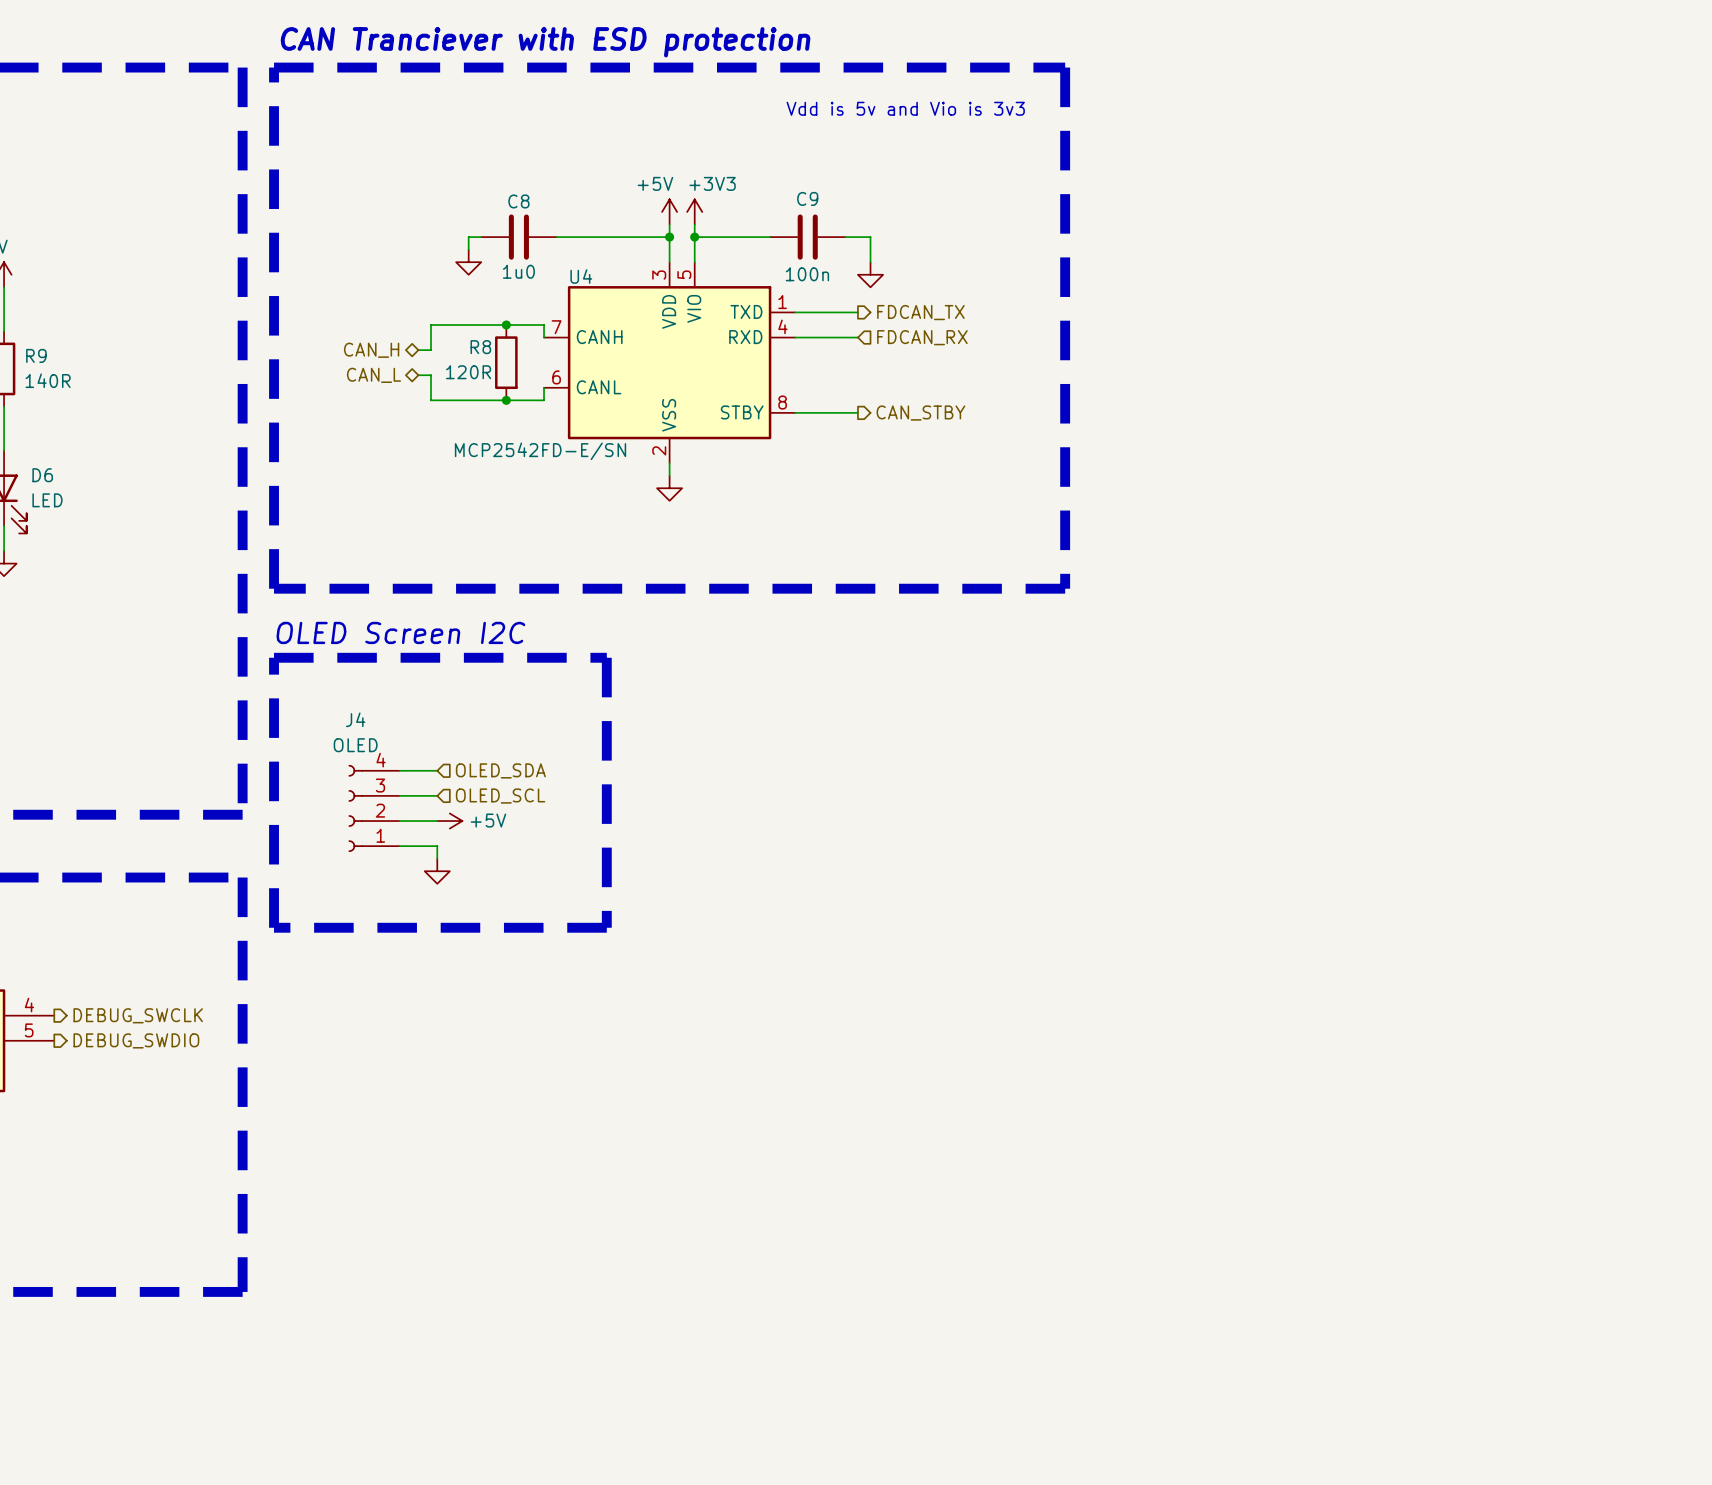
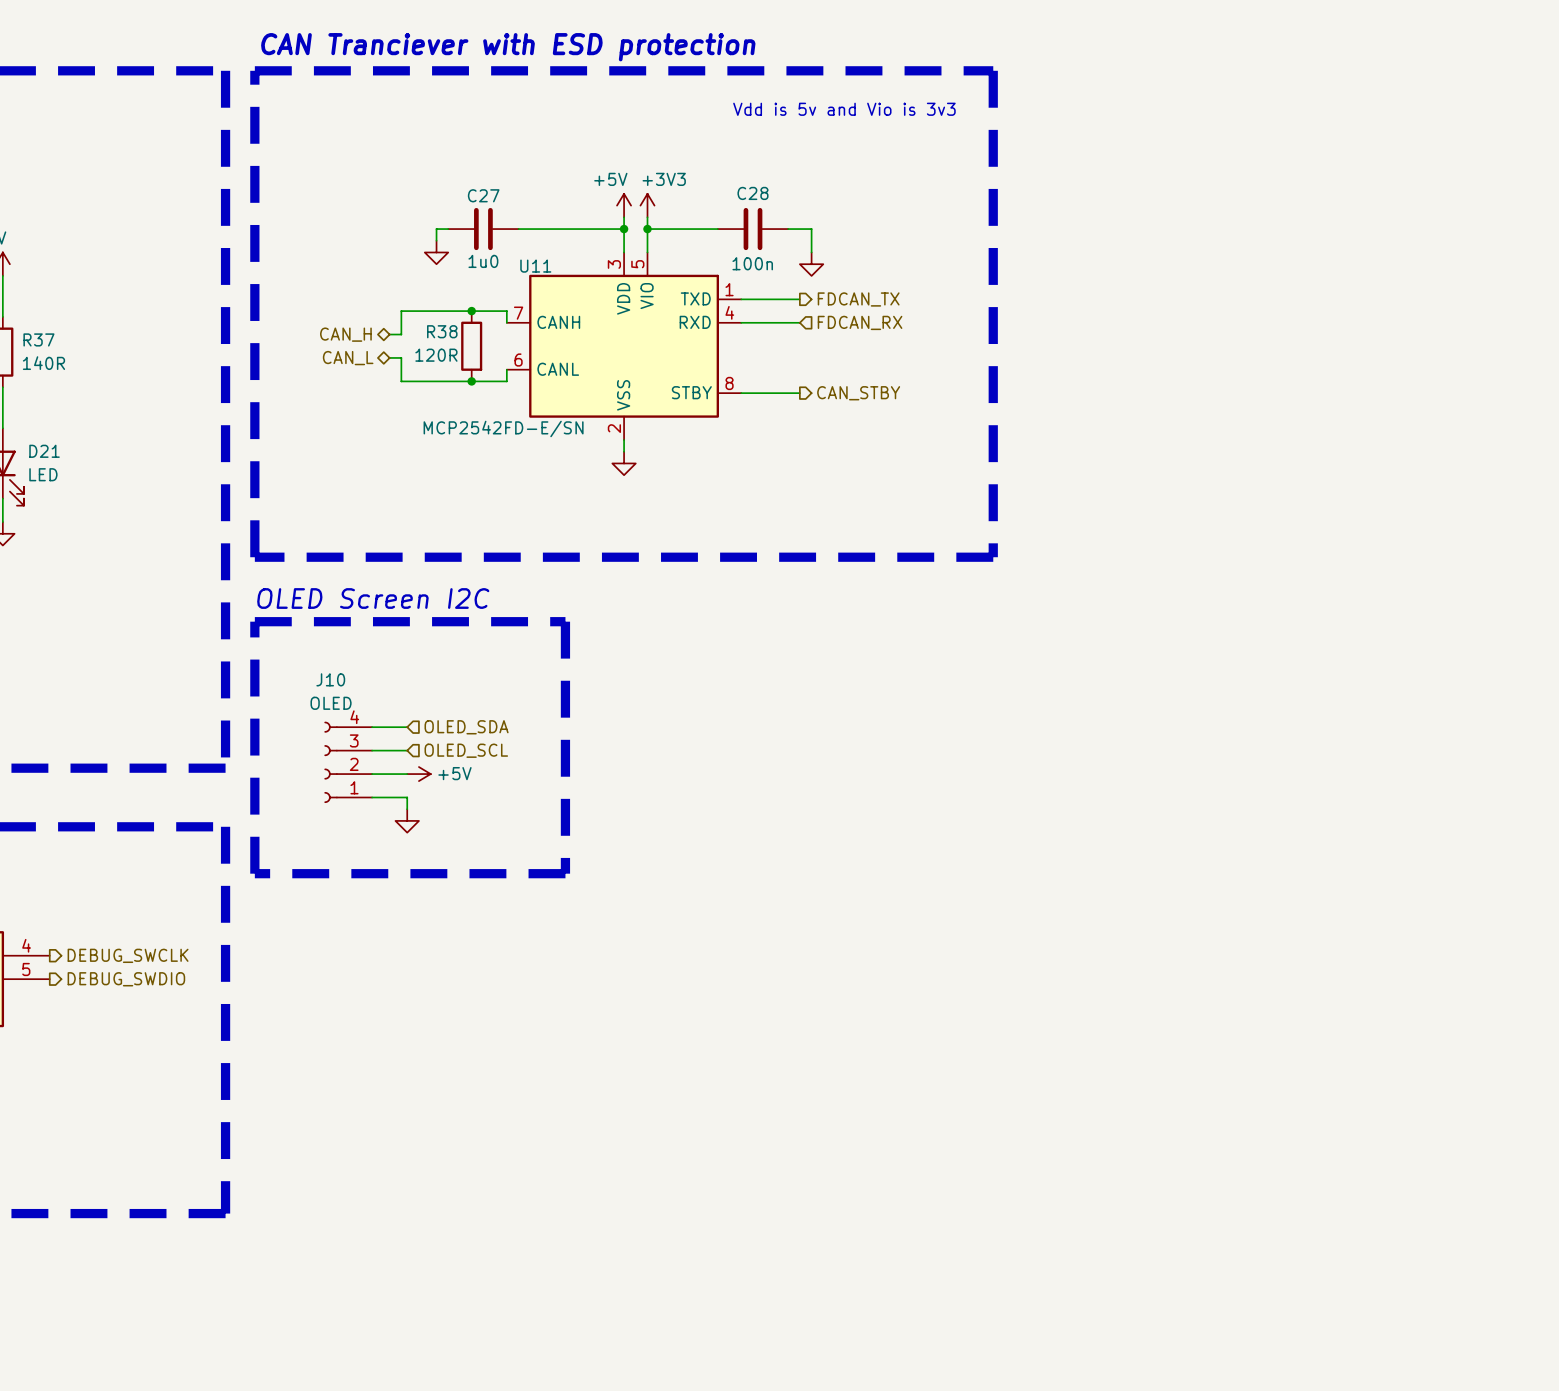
C9 name: C9 (807, 198) -> C28 (752, 193)
C8 name: C8 (518, 201) -> C27 (483, 195)
U4 name: U4 (581, 276) -> U11 (535, 266)
R8 name: R8 (480, 347) -> R38 (442, 331)
R9 name: R9 (36, 355) -> R37 (38, 339)
D6 name: D6 (42, 475) -> D21 (44, 451)
J4 name: J4 (355, 719) -> J10 (330, 679)

